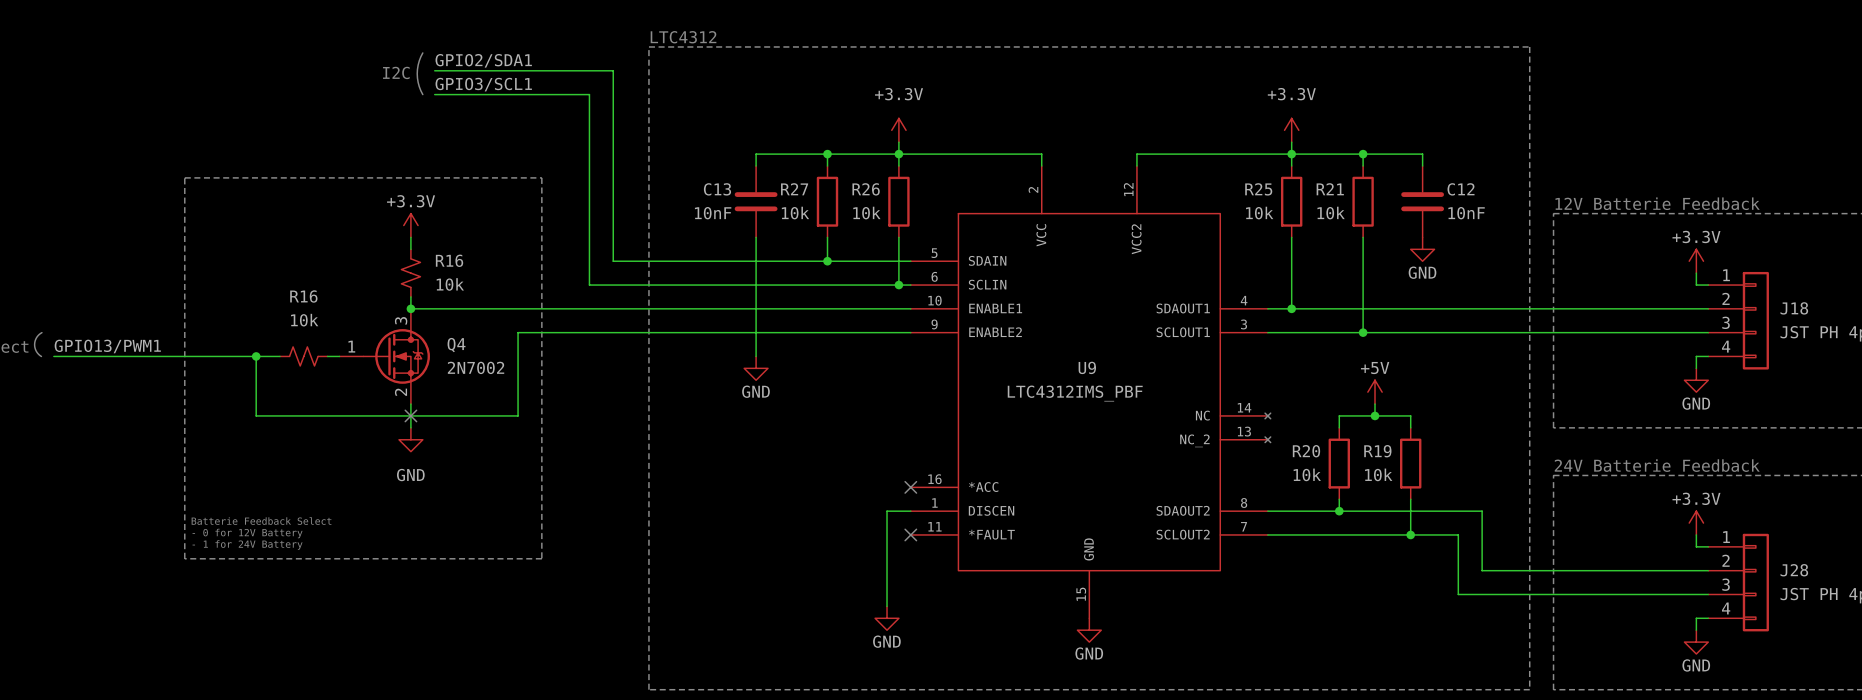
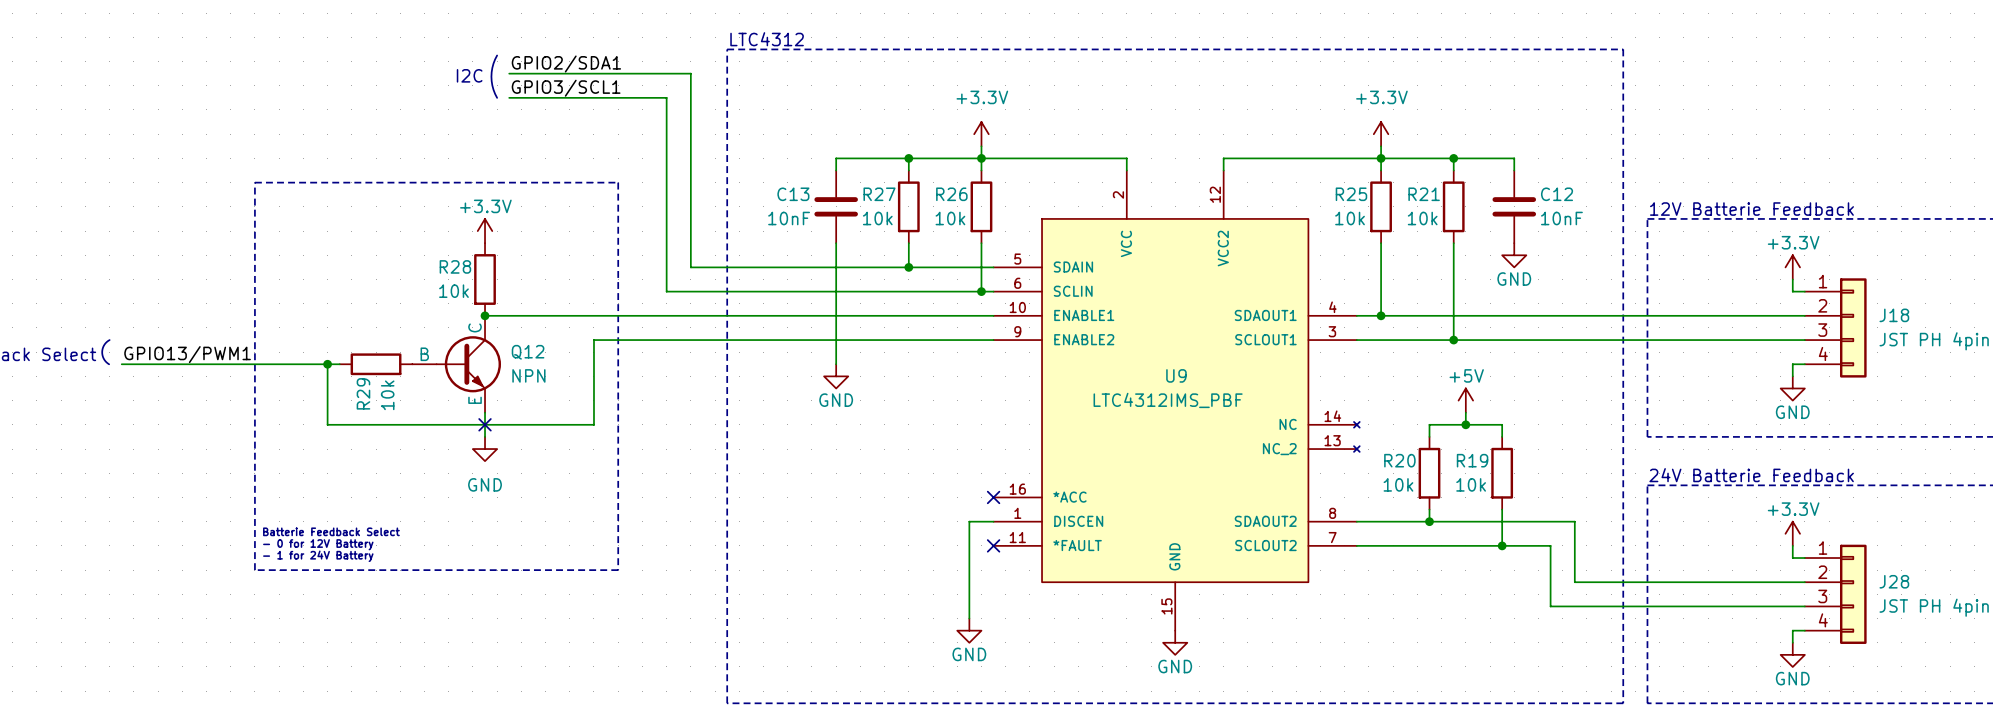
R16: 10k (410, 273) -> none
R28: none -> 10k (485, 279)
R16: 10k (303, 356) -> none
R29: none -> 10k (376, 364)
Q12: none -> NPN (456, 364)
Q4: 2N7002 (384, 356) -> none

